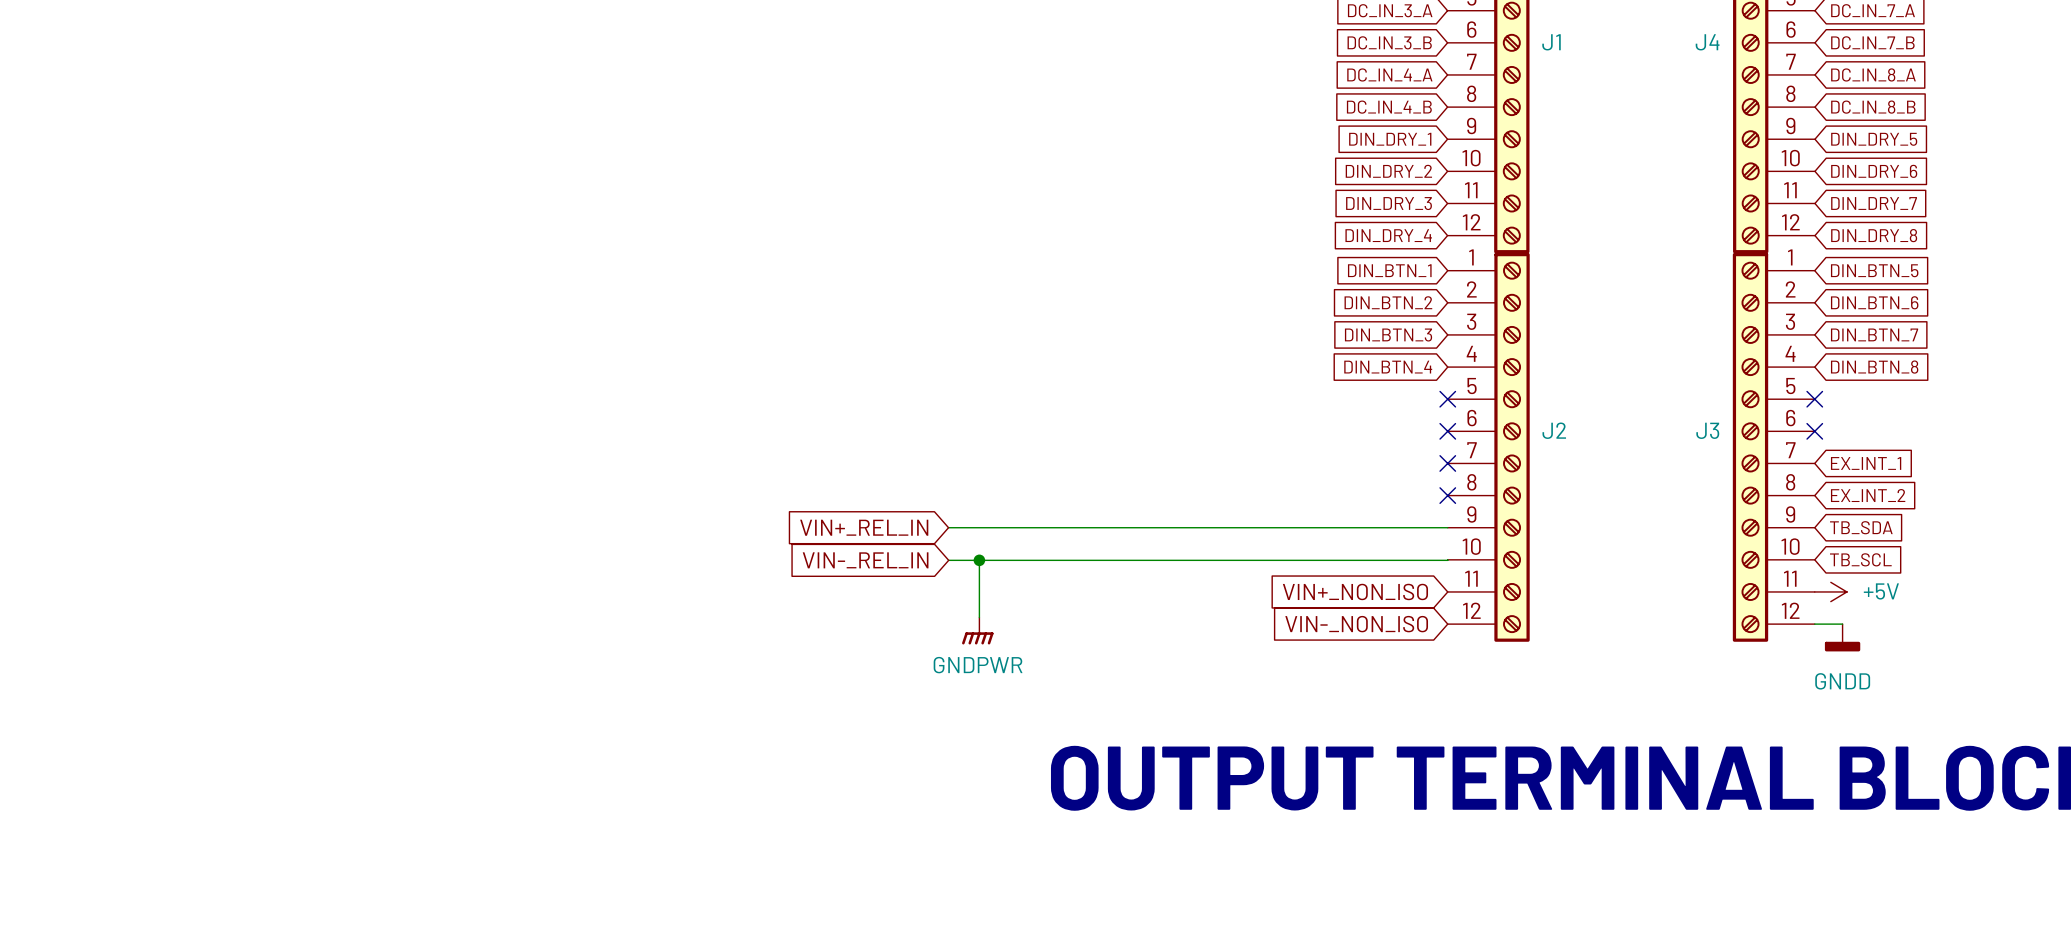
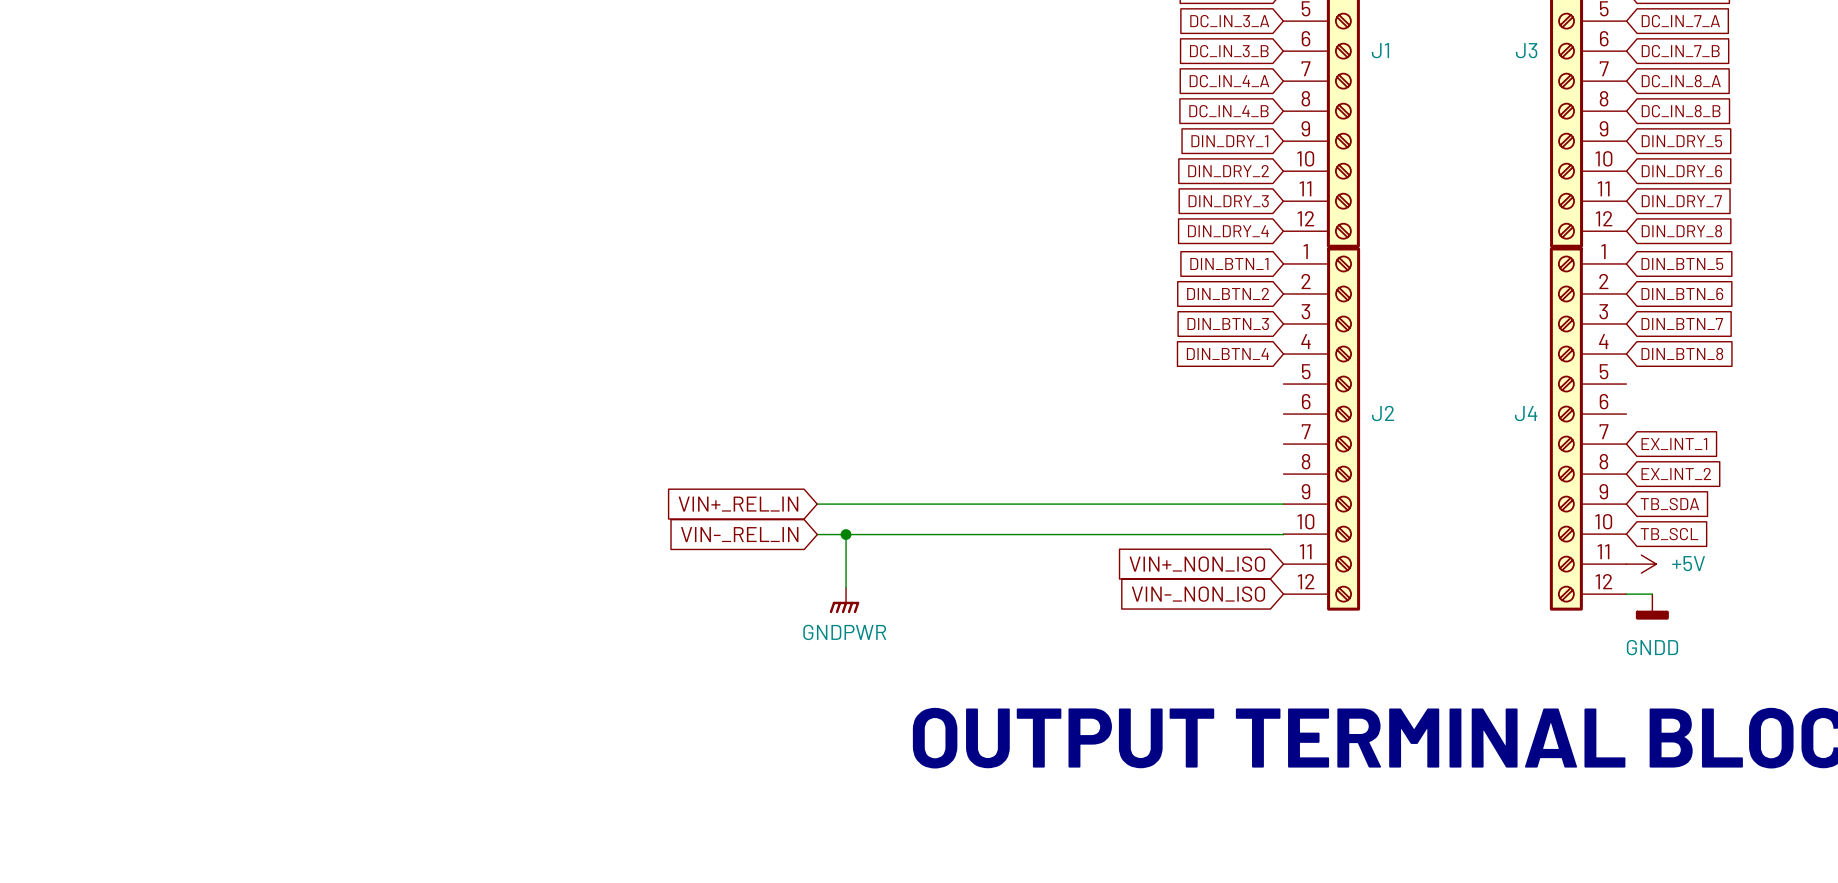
J4 name: J4 (1707, 42) -> J3 (1526, 50)
no-connect mark: (1447, 399) -> none
no-connect mark: (1814, 399) -> none
J3 name: J3 (1707, 430) -> J4 (1526, 413)
no-connect mark: (1447, 431) -> none
no-connect mark: (1814, 431) -> none
no-connect mark: (1447, 463) -> none
no-connect mark: (1447, 495) -> none

